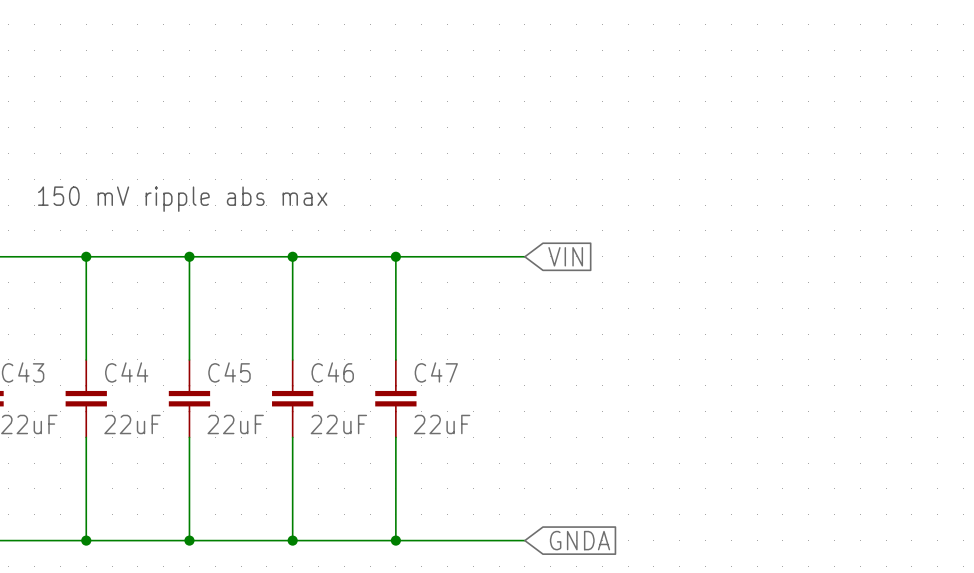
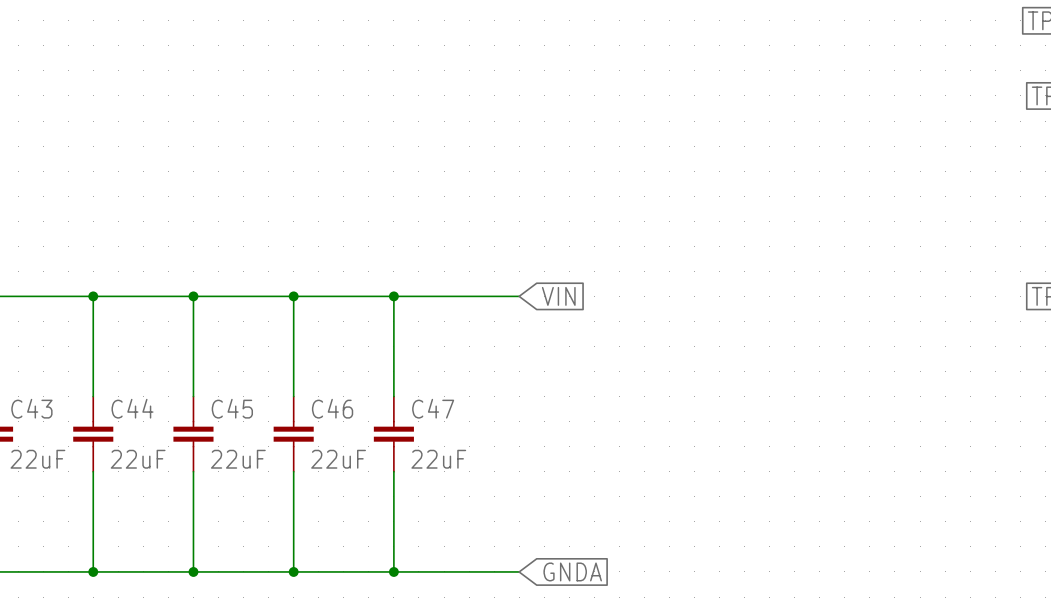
text: 150 mV ripple abs max (182, 199) -> none

